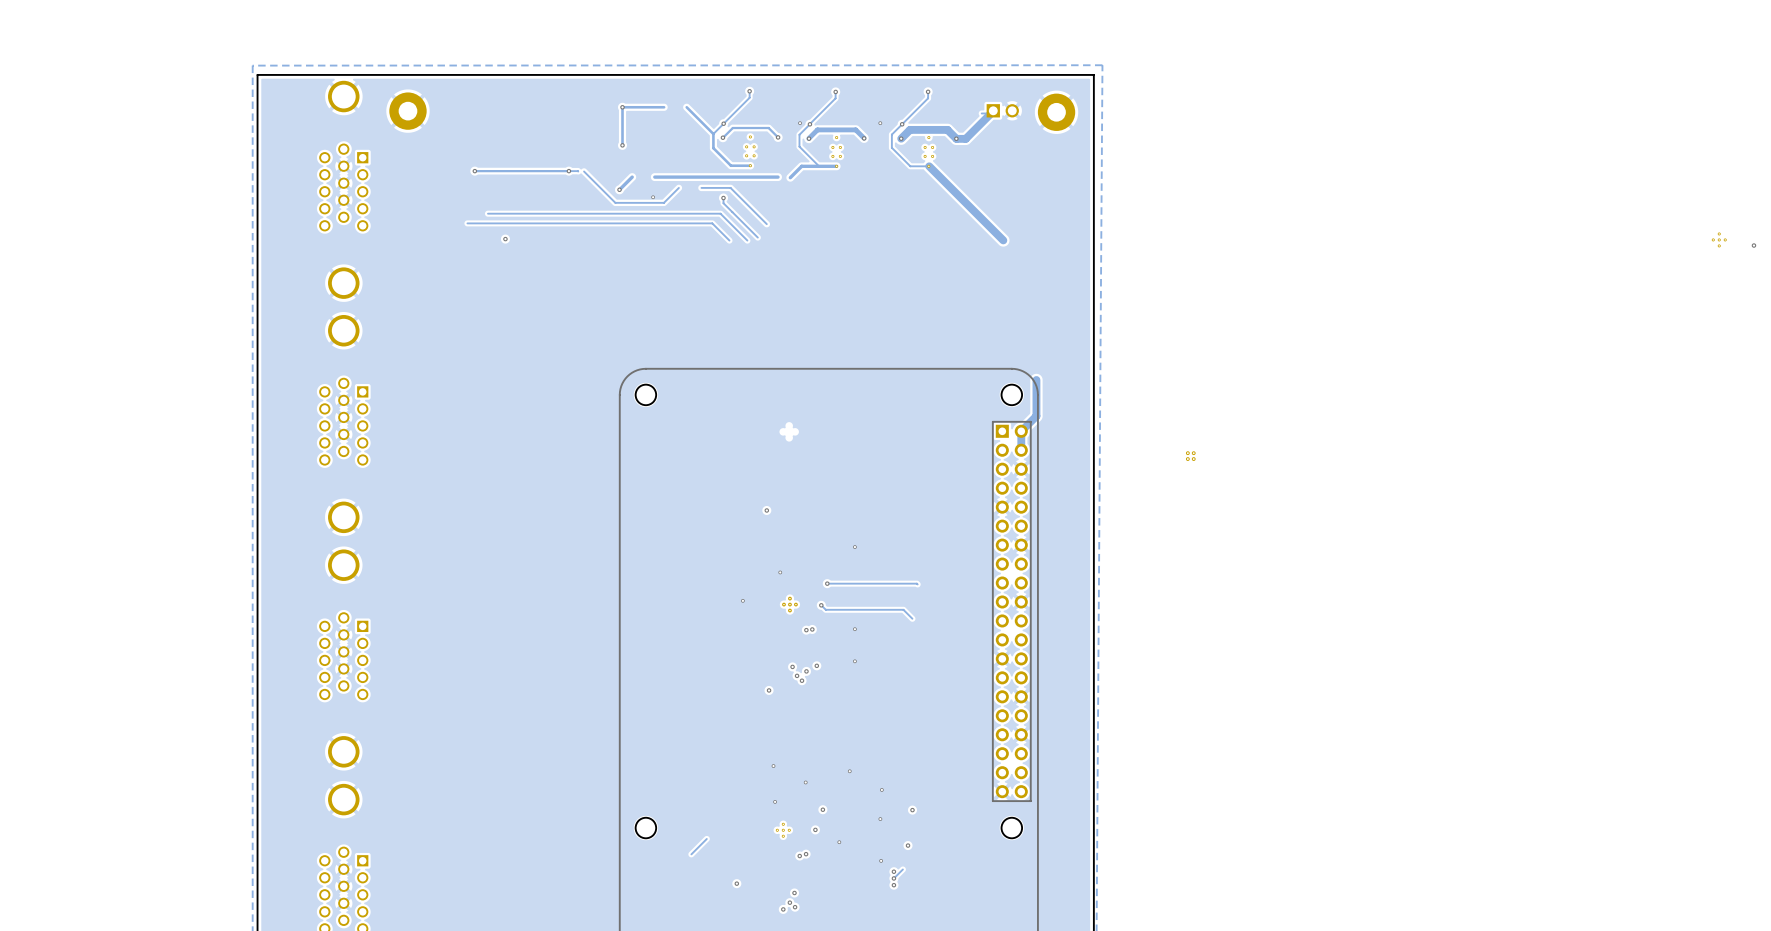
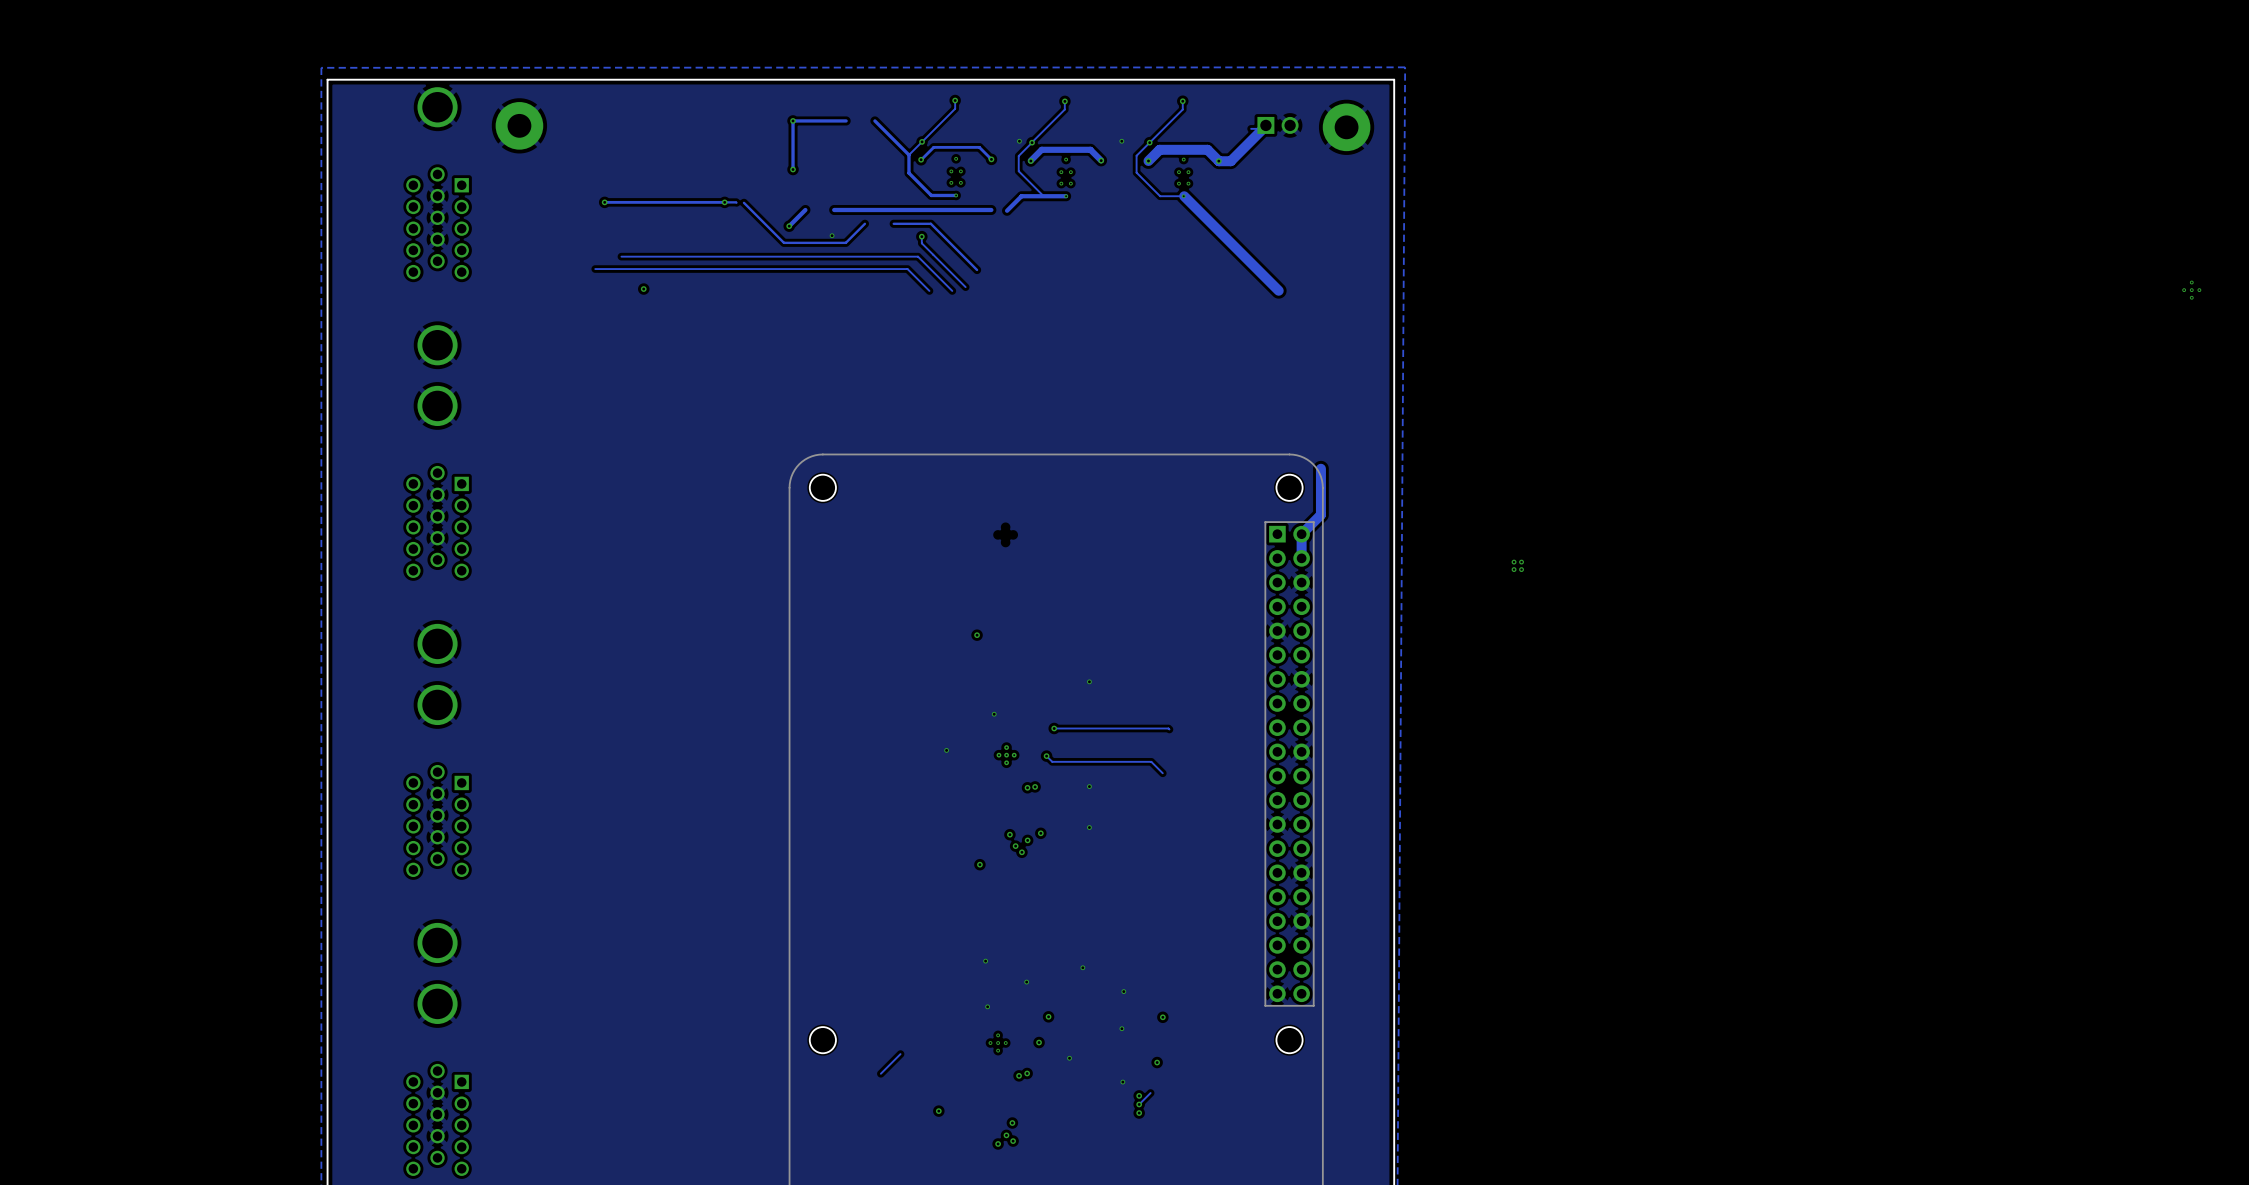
via: (1753, 245) -> none

